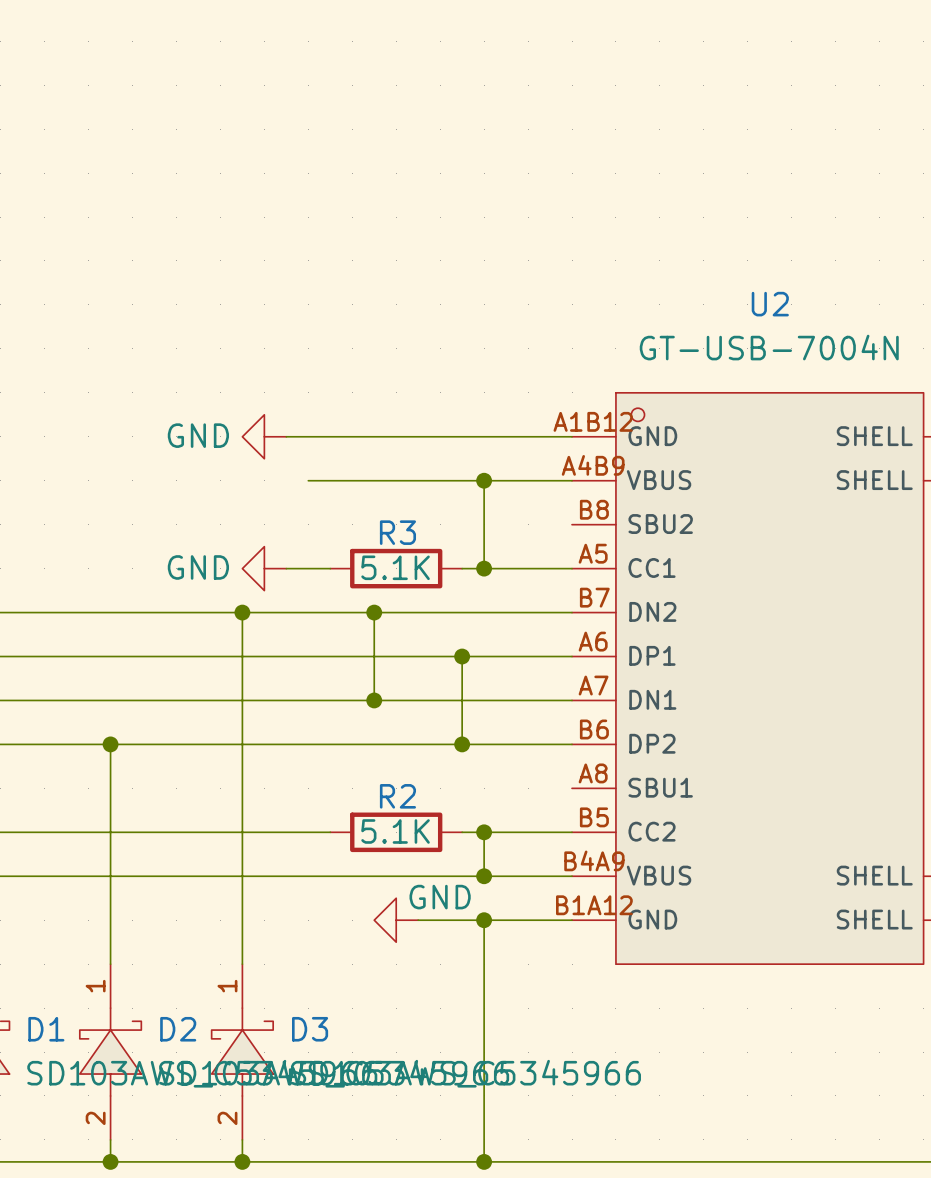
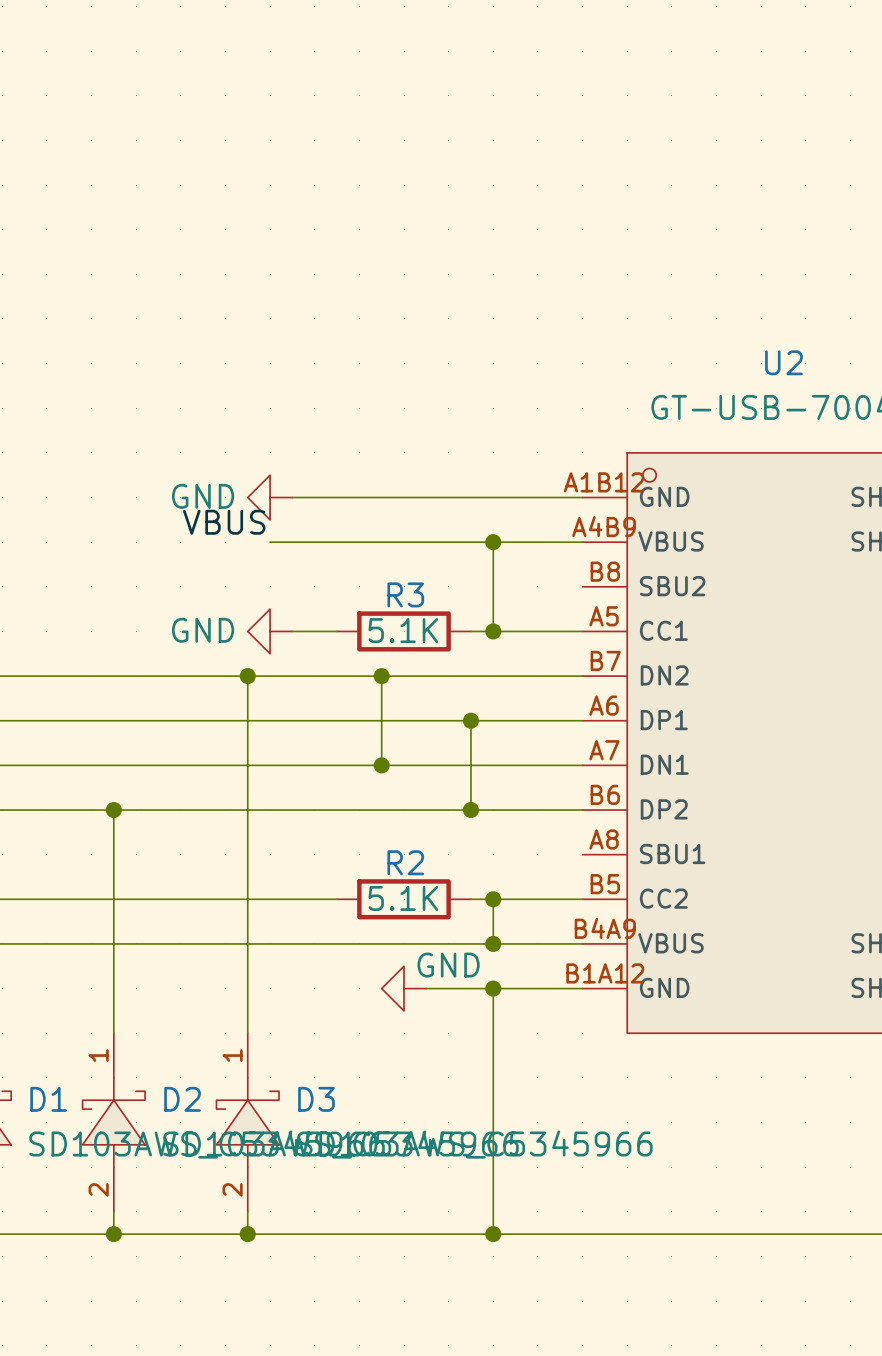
label: none -> VBUS (224, 522)
wire: none -> (270, 542) (314, 542)

